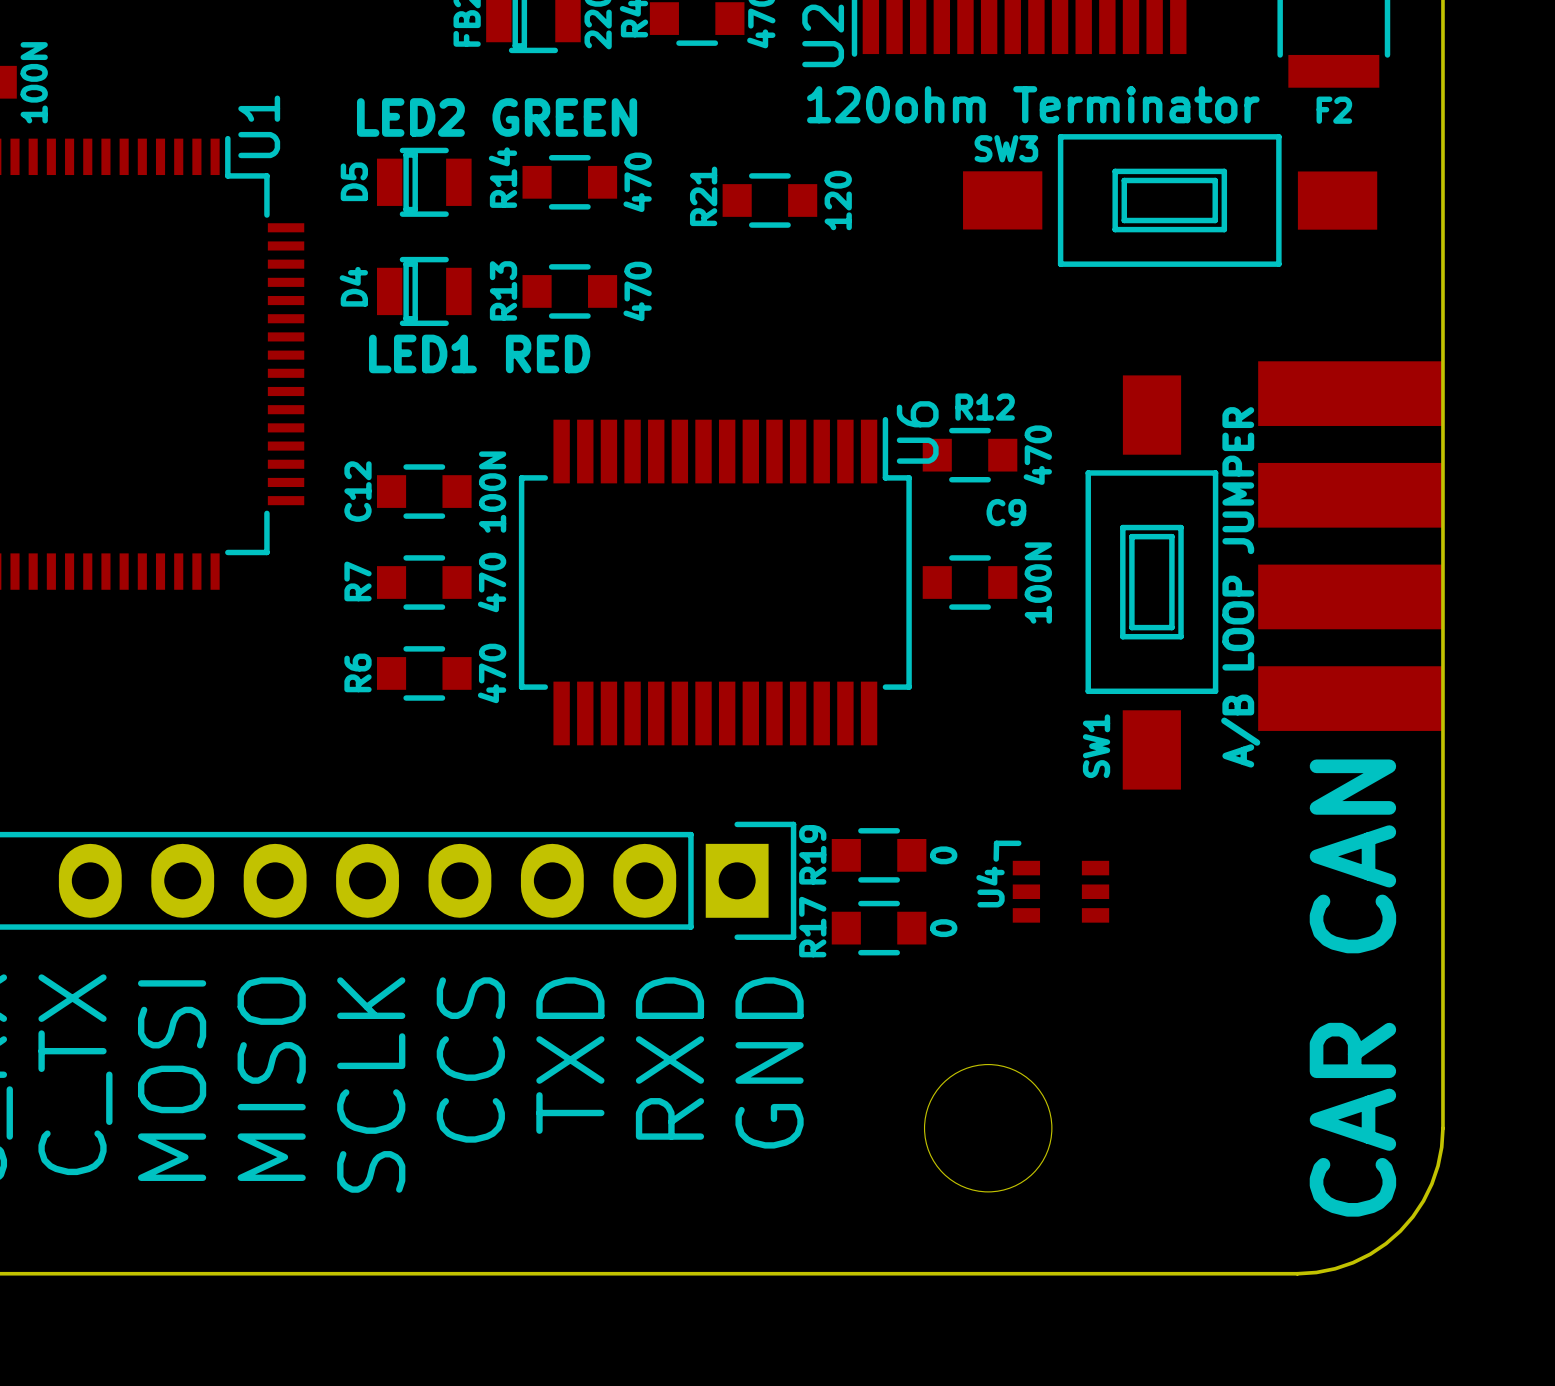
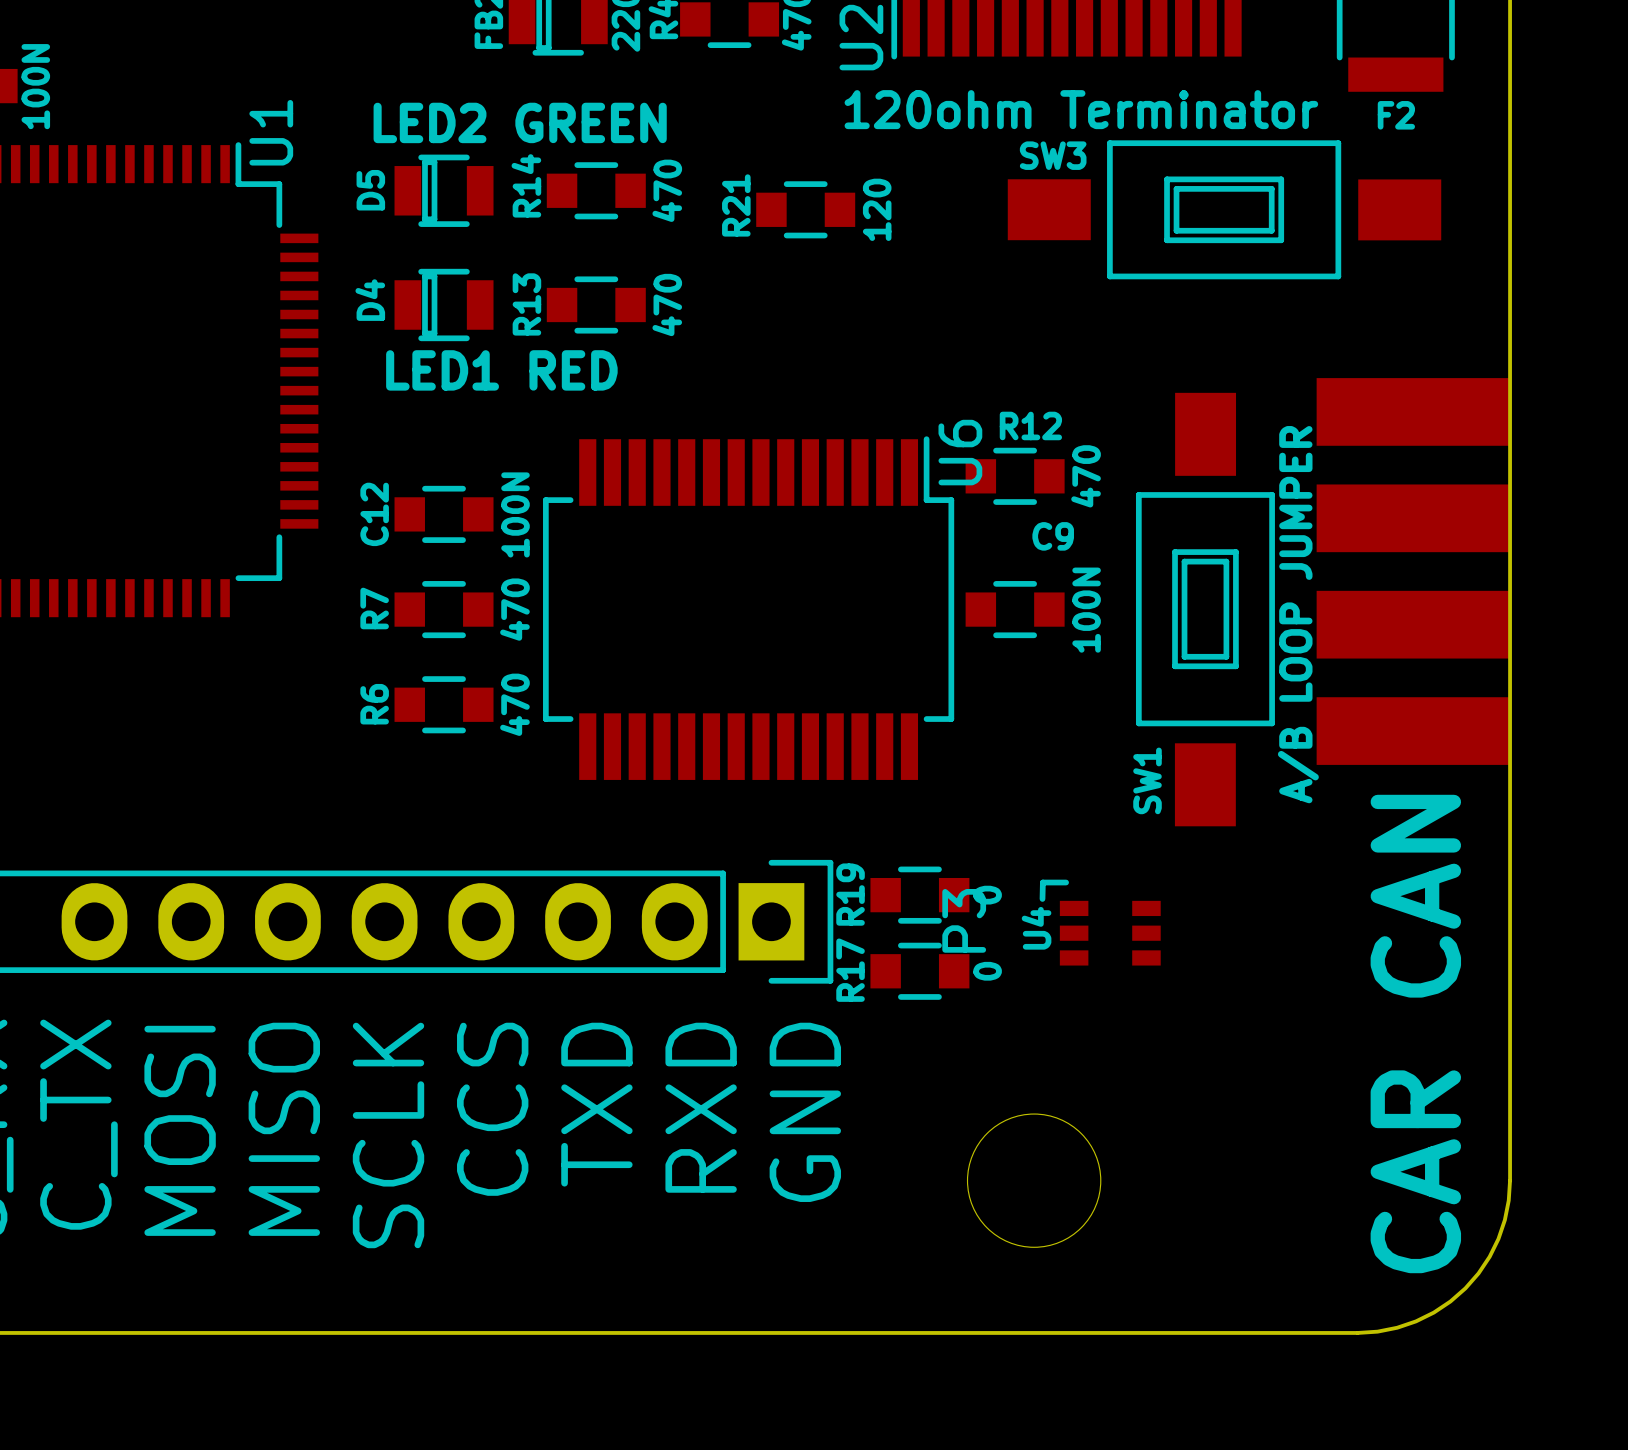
P3 name: none -> P3 (964, 920)

